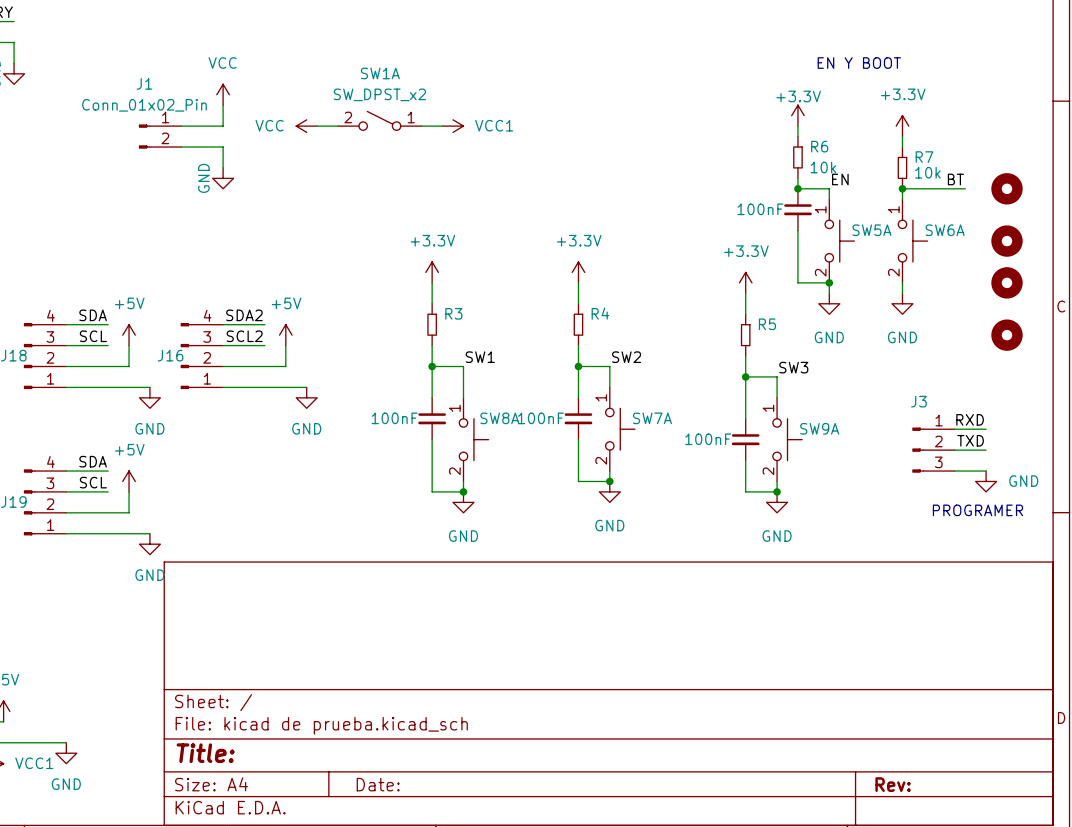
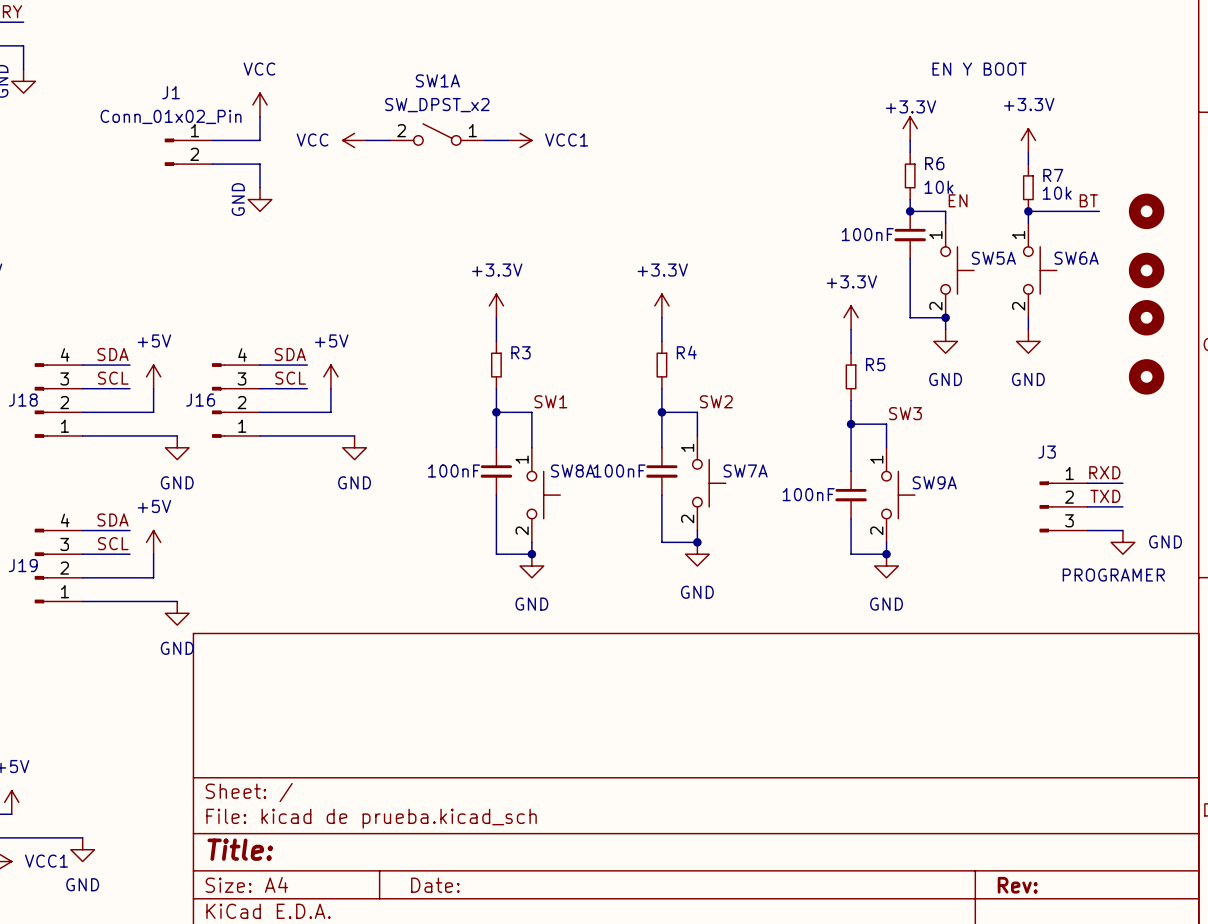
label: SDA2 (244, 315) -> SDA (290, 354)
label: SCL2 (244, 336) -> SCL (290, 378)

